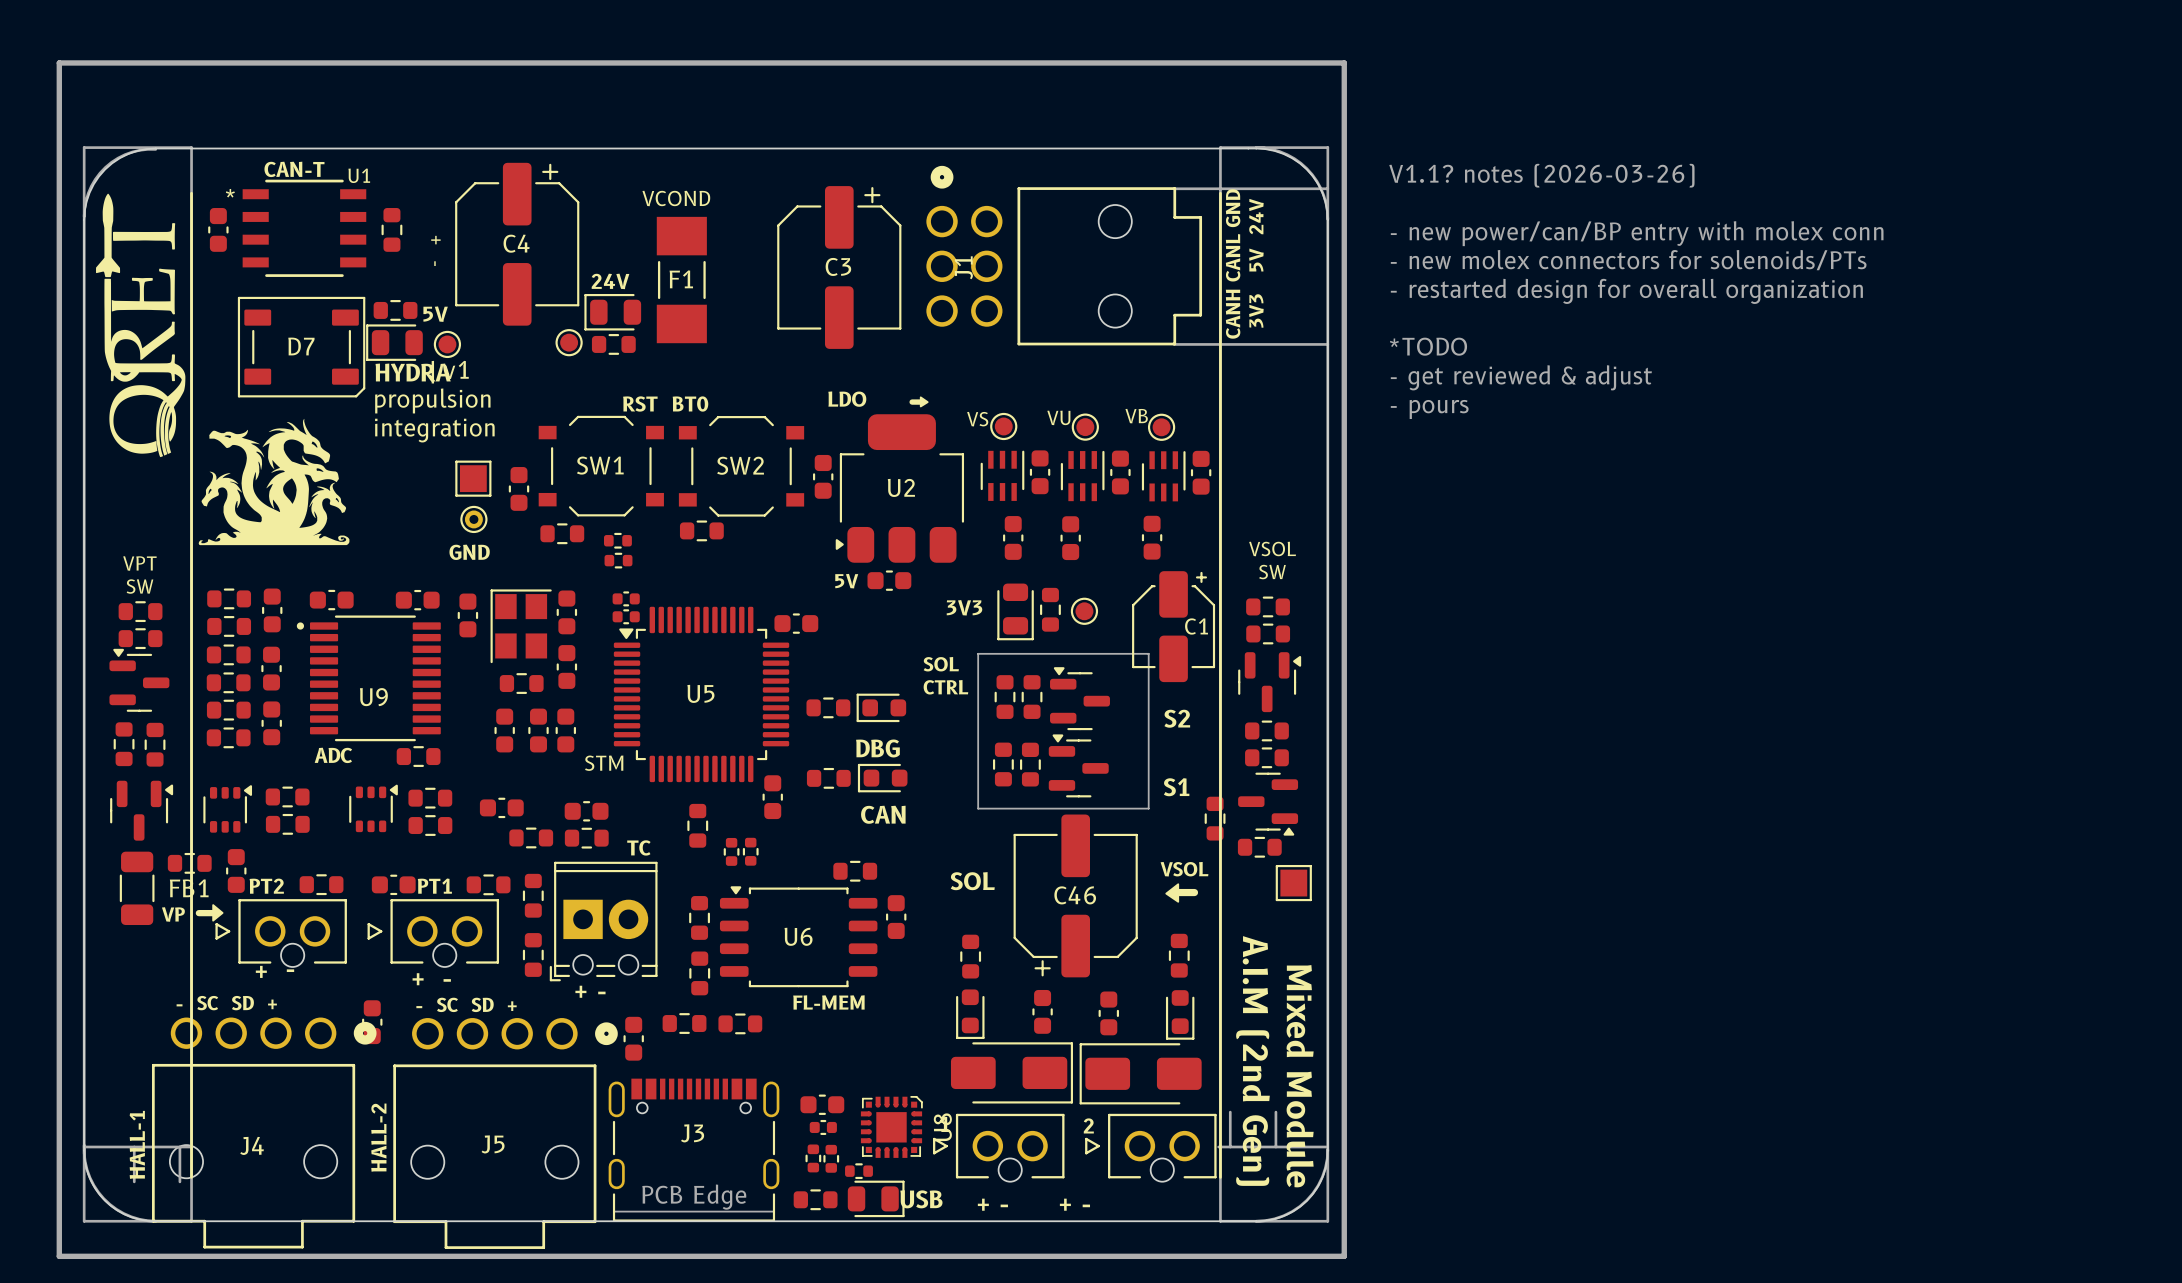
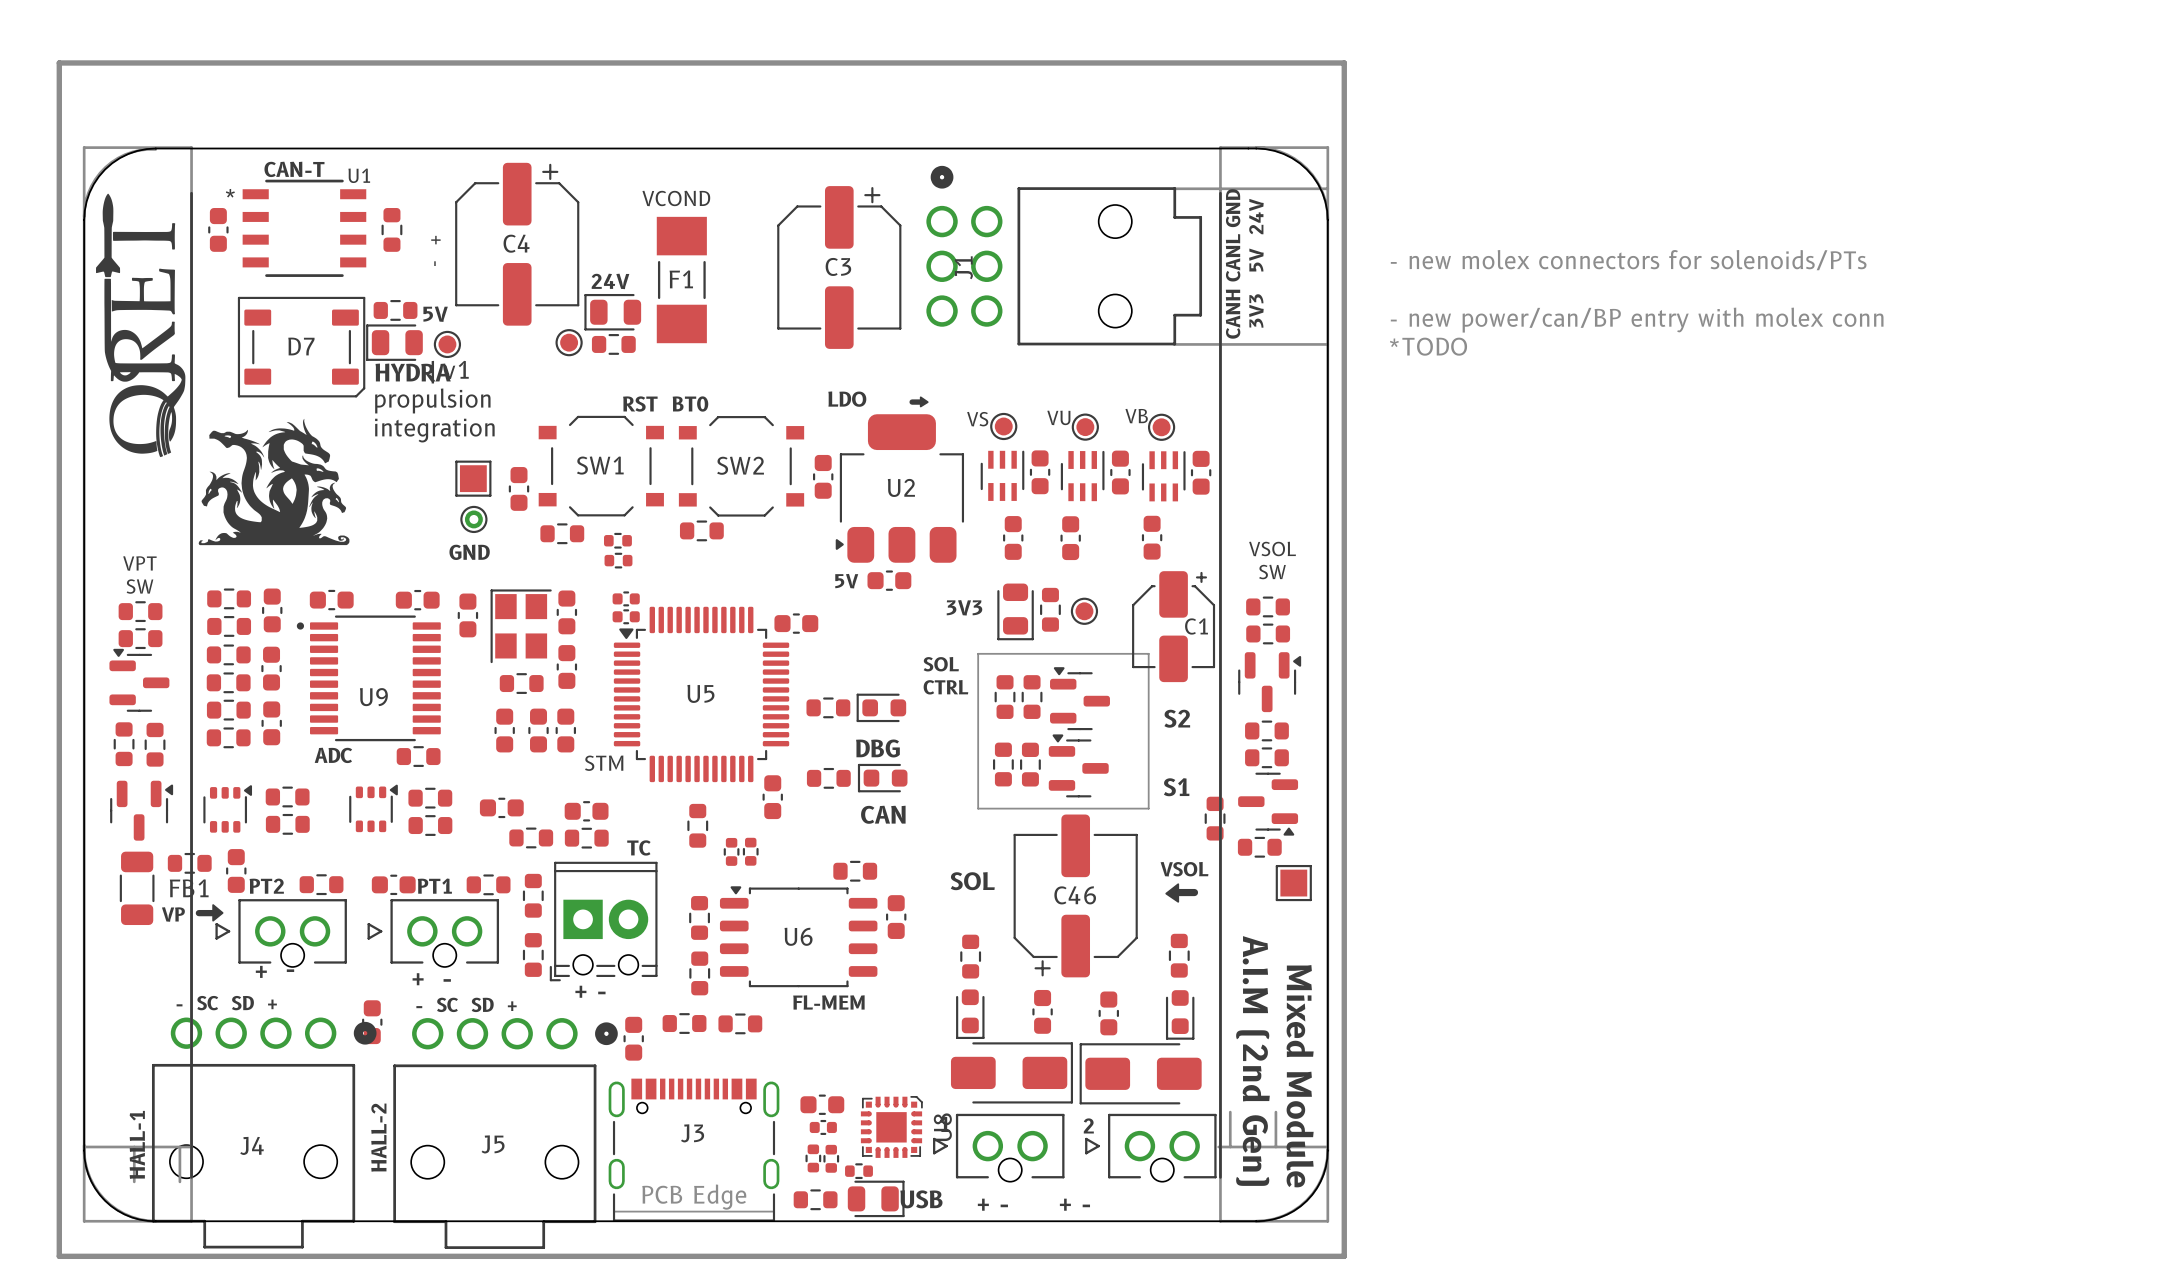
text: V1.1? notes (2026-03-26) (1541, 175) -> none
text position: - new power/can/BP entry with molex conn (1637, 233) -> - new power/can/BP entry with molex conn (1637, 320)
text: - restarted design for overall organization (1626, 291) -> none
text: - get reviewed & adjust (1521, 377) -> none
text: - pours (1429, 409) -> none

